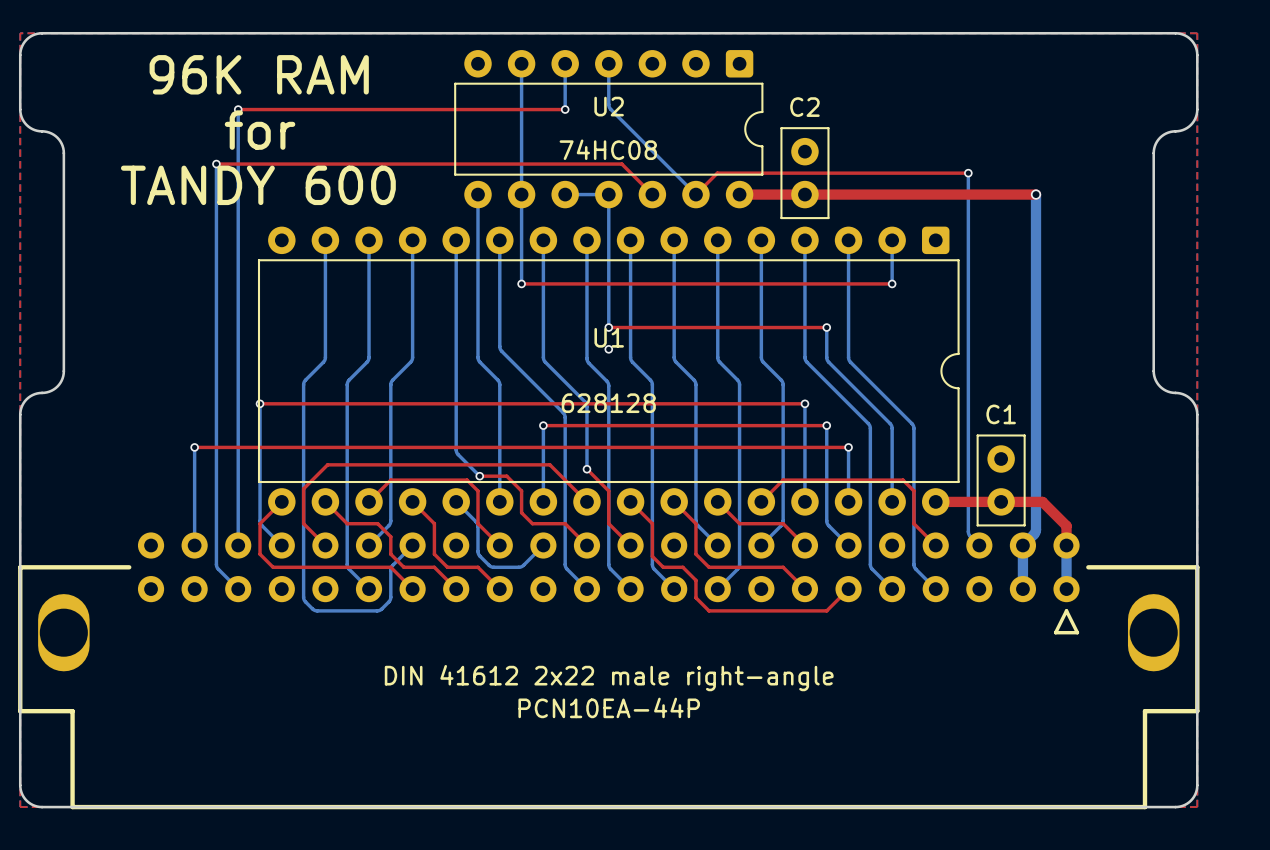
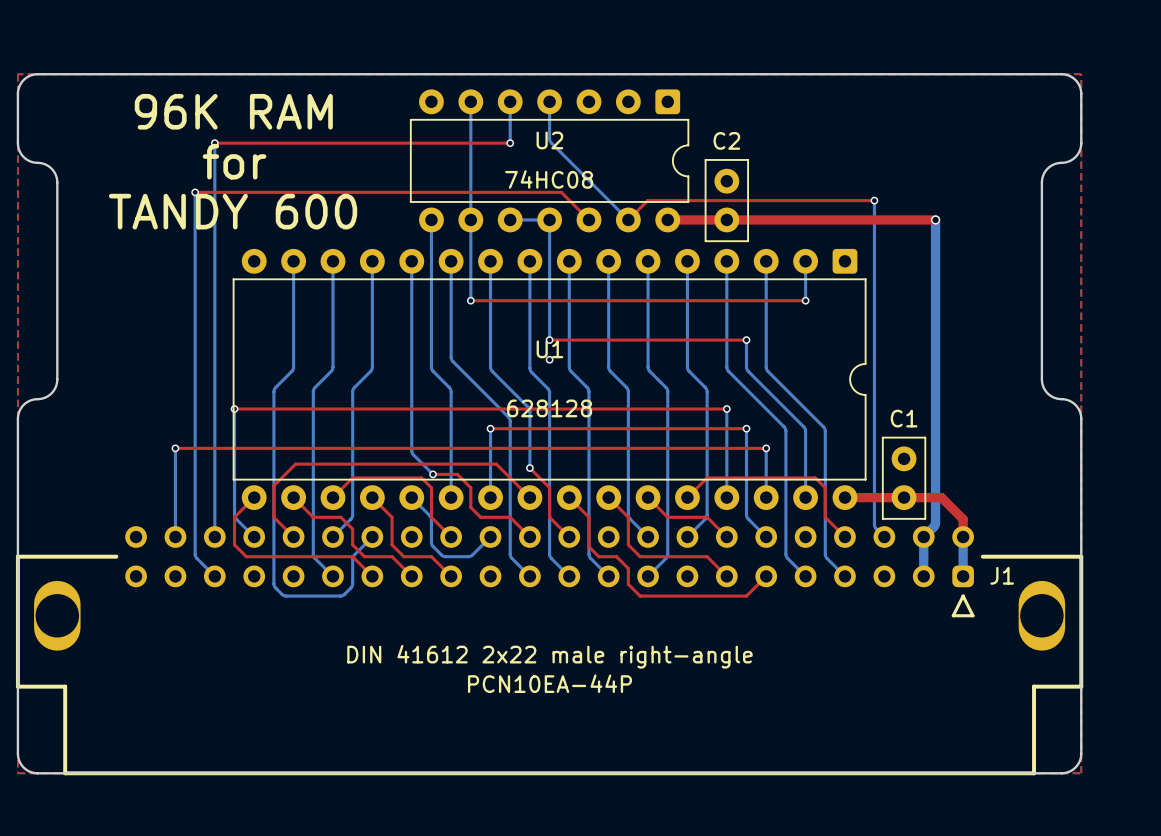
part: DIN 41612 2x22 male right-angle (608, 670) -> none
J1: none -> DIN 41612 2x22 male right-angle (549, 650)

